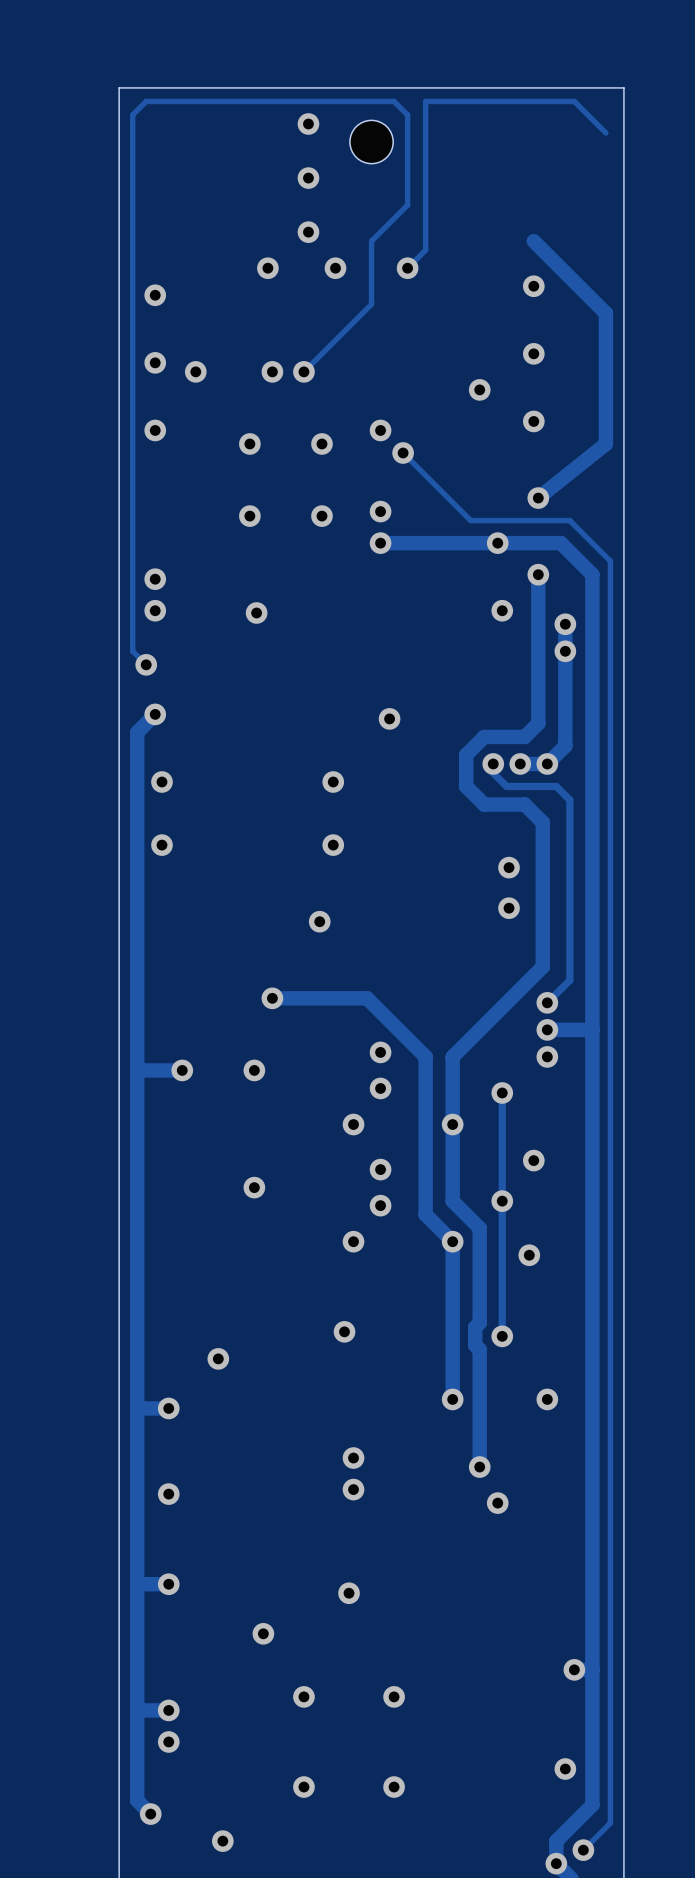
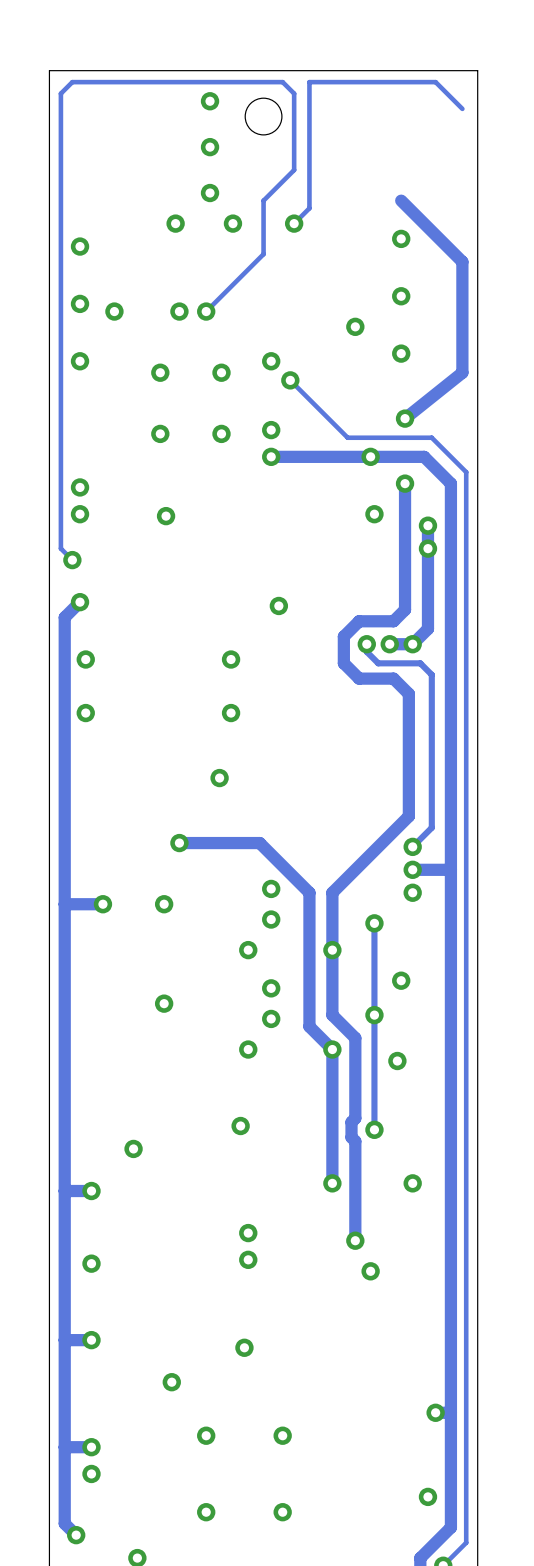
via: (509, 867) -> none
via: (509, 908) -> none

